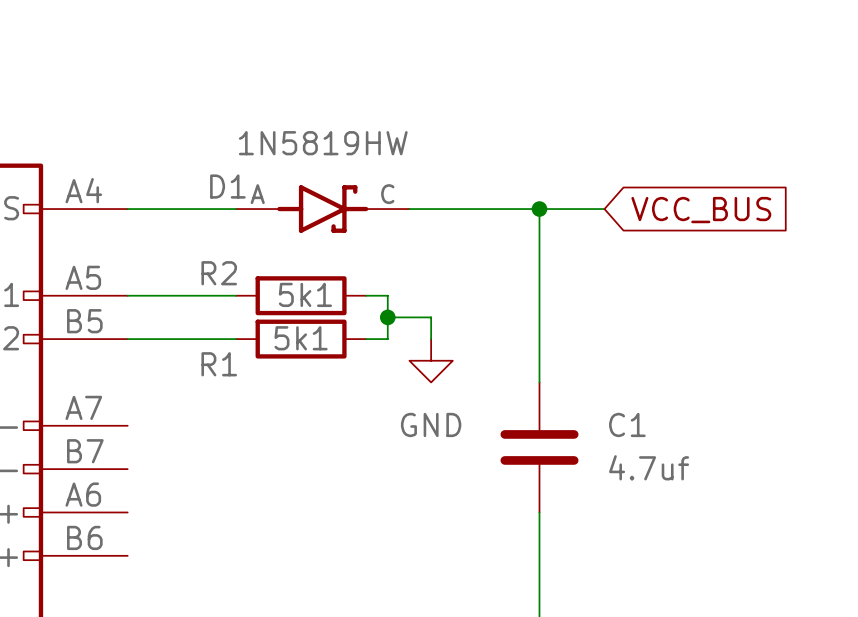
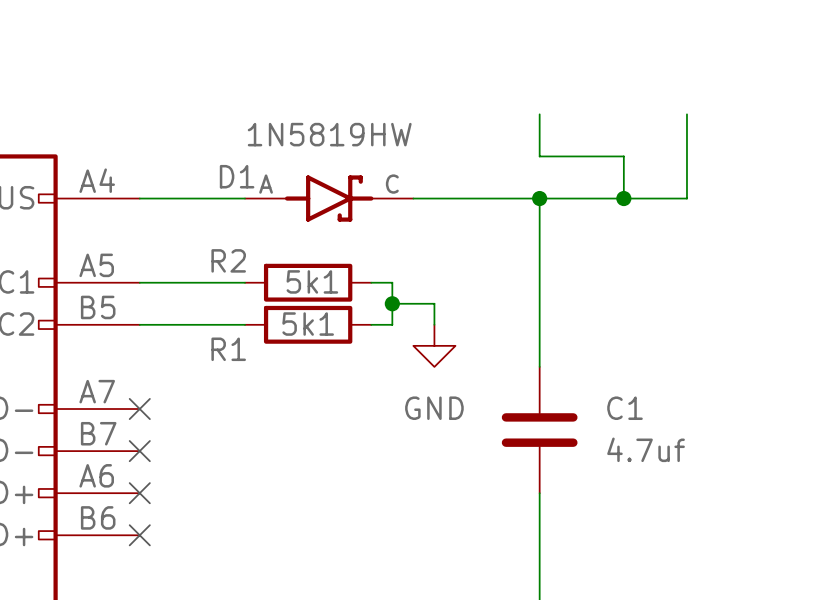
wire: none -> (539, 114) (539, 156) (623, 156) (623, 198)
wire: none -> (686, 114) (686, 198) (602, 198)
junction: none -> (623, 198)
global label: VCC_BUS (701, 210) -> none
no-connect mark: none -> (139, 409)
no-connect mark: none -> (139, 451)
no-connect mark: none -> (139, 493)
no-connect mark: none -> (139, 535)

